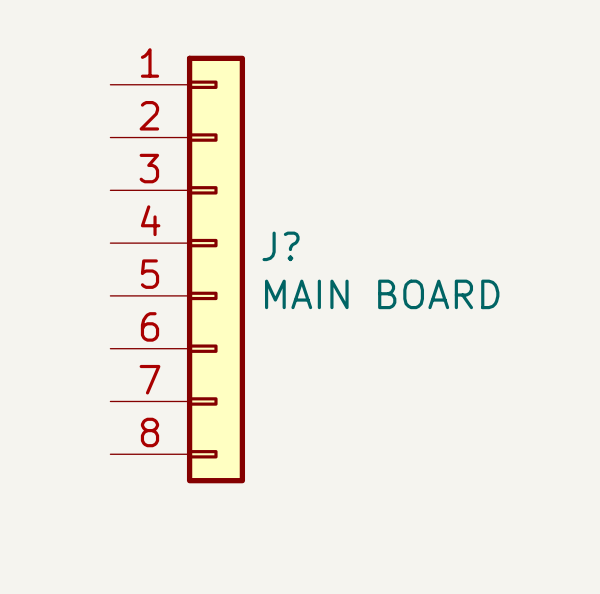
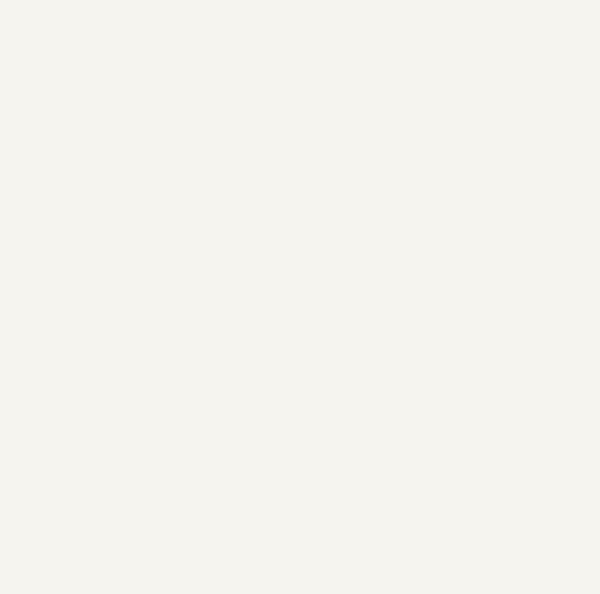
J?: MAIN BOARD (177, 269) -> none

